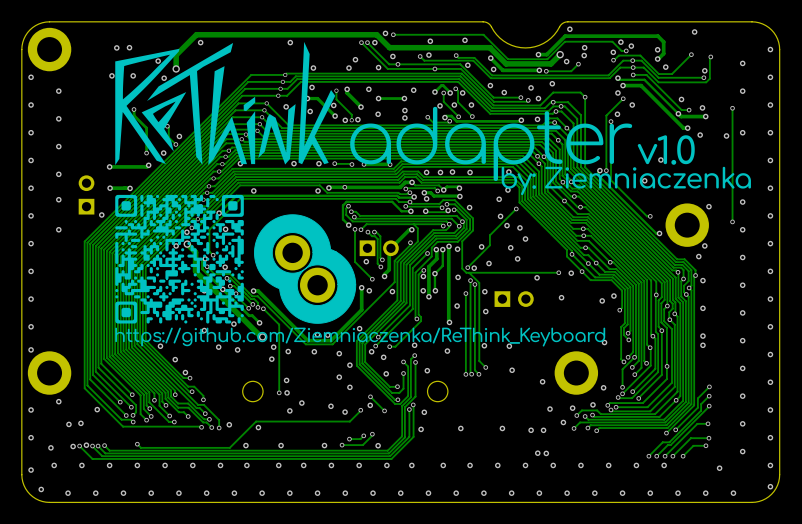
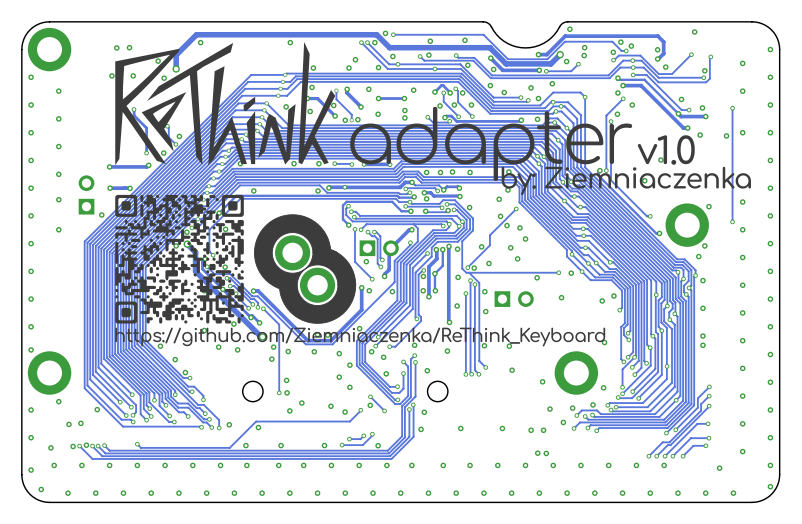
via: none -> (251, 317)

